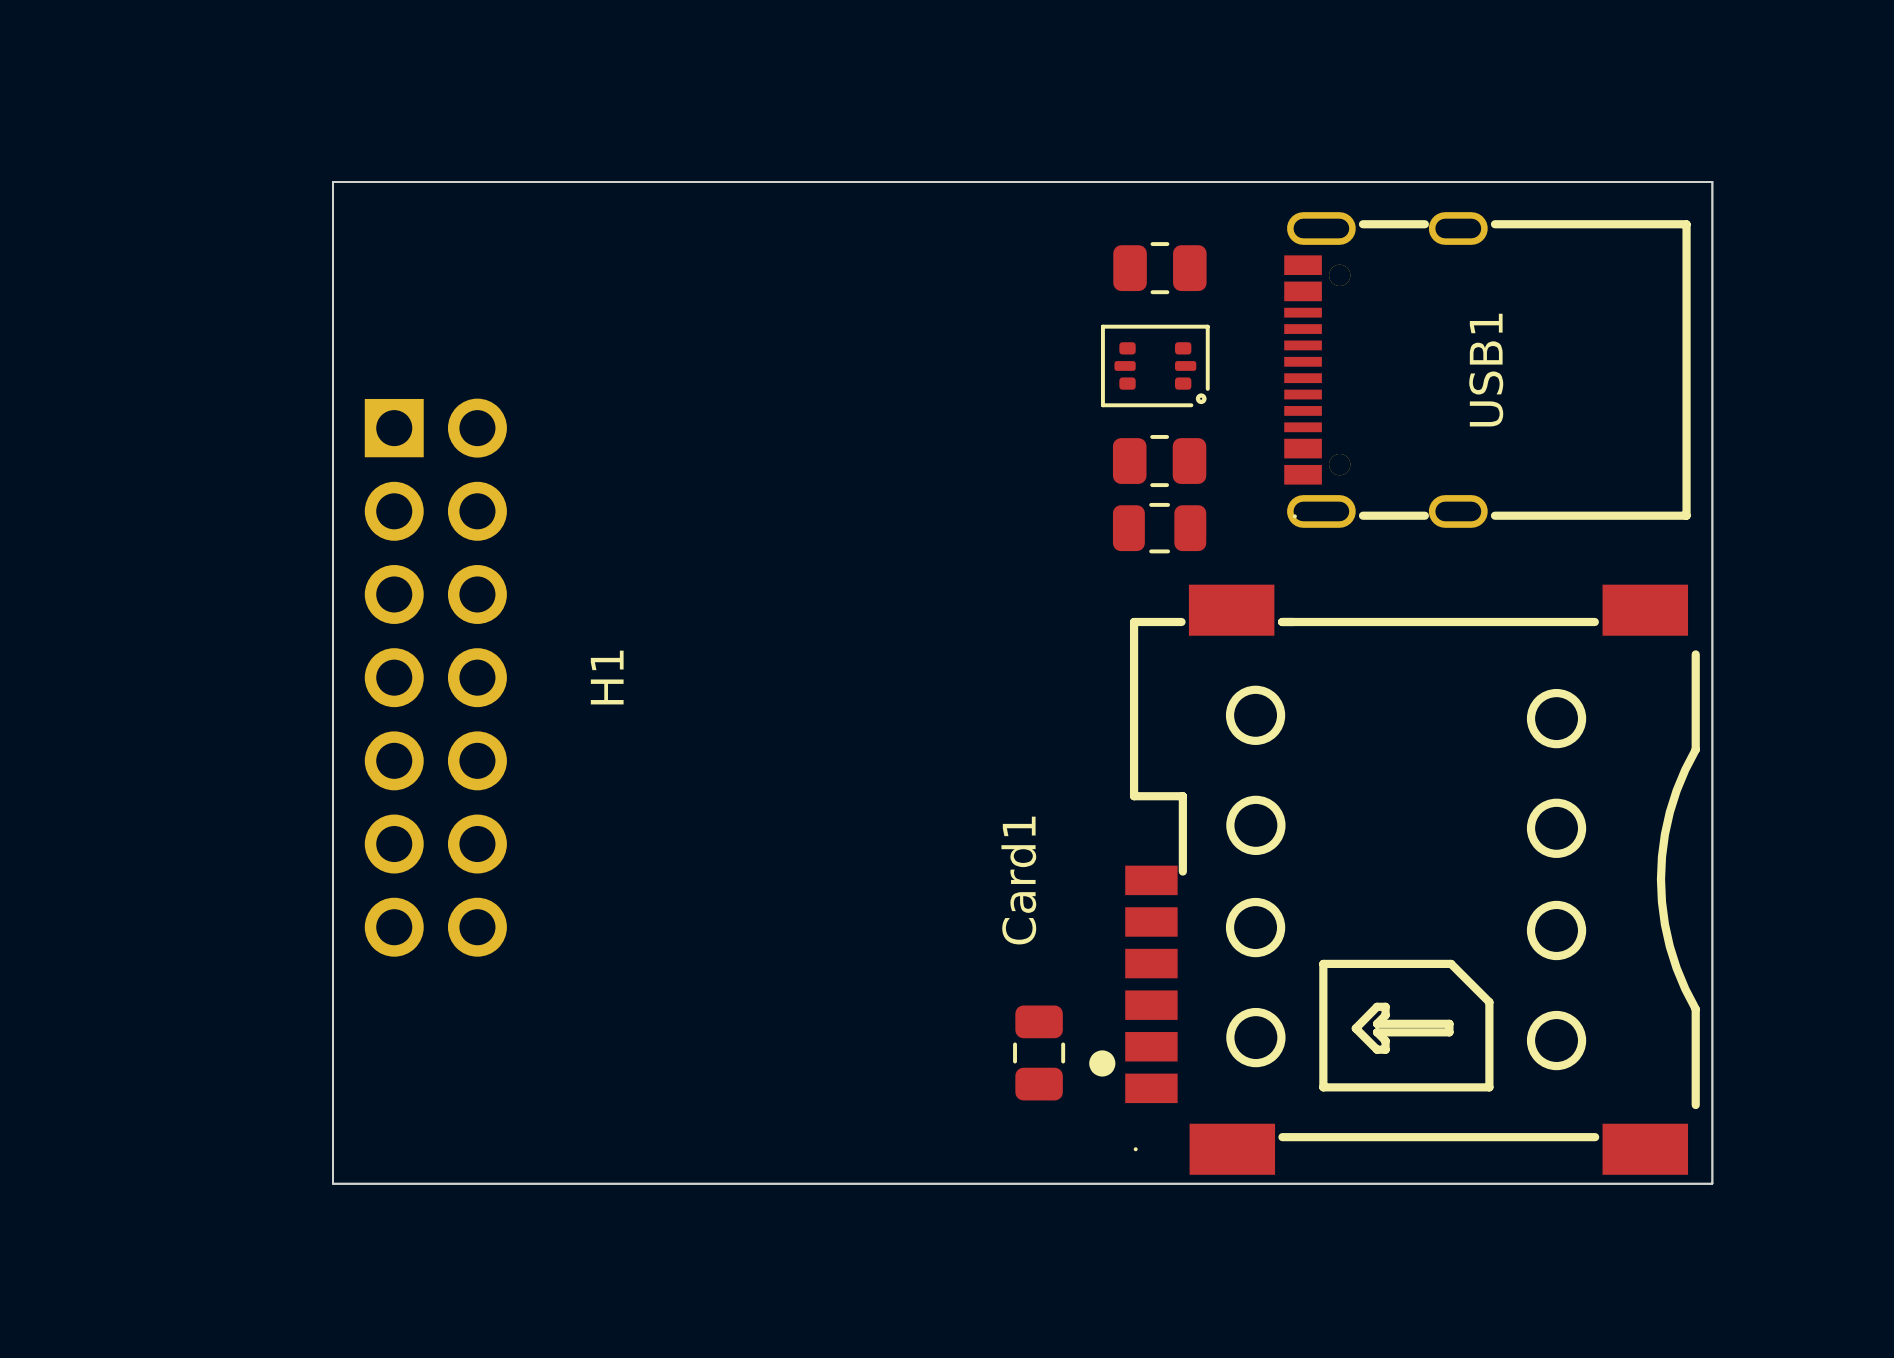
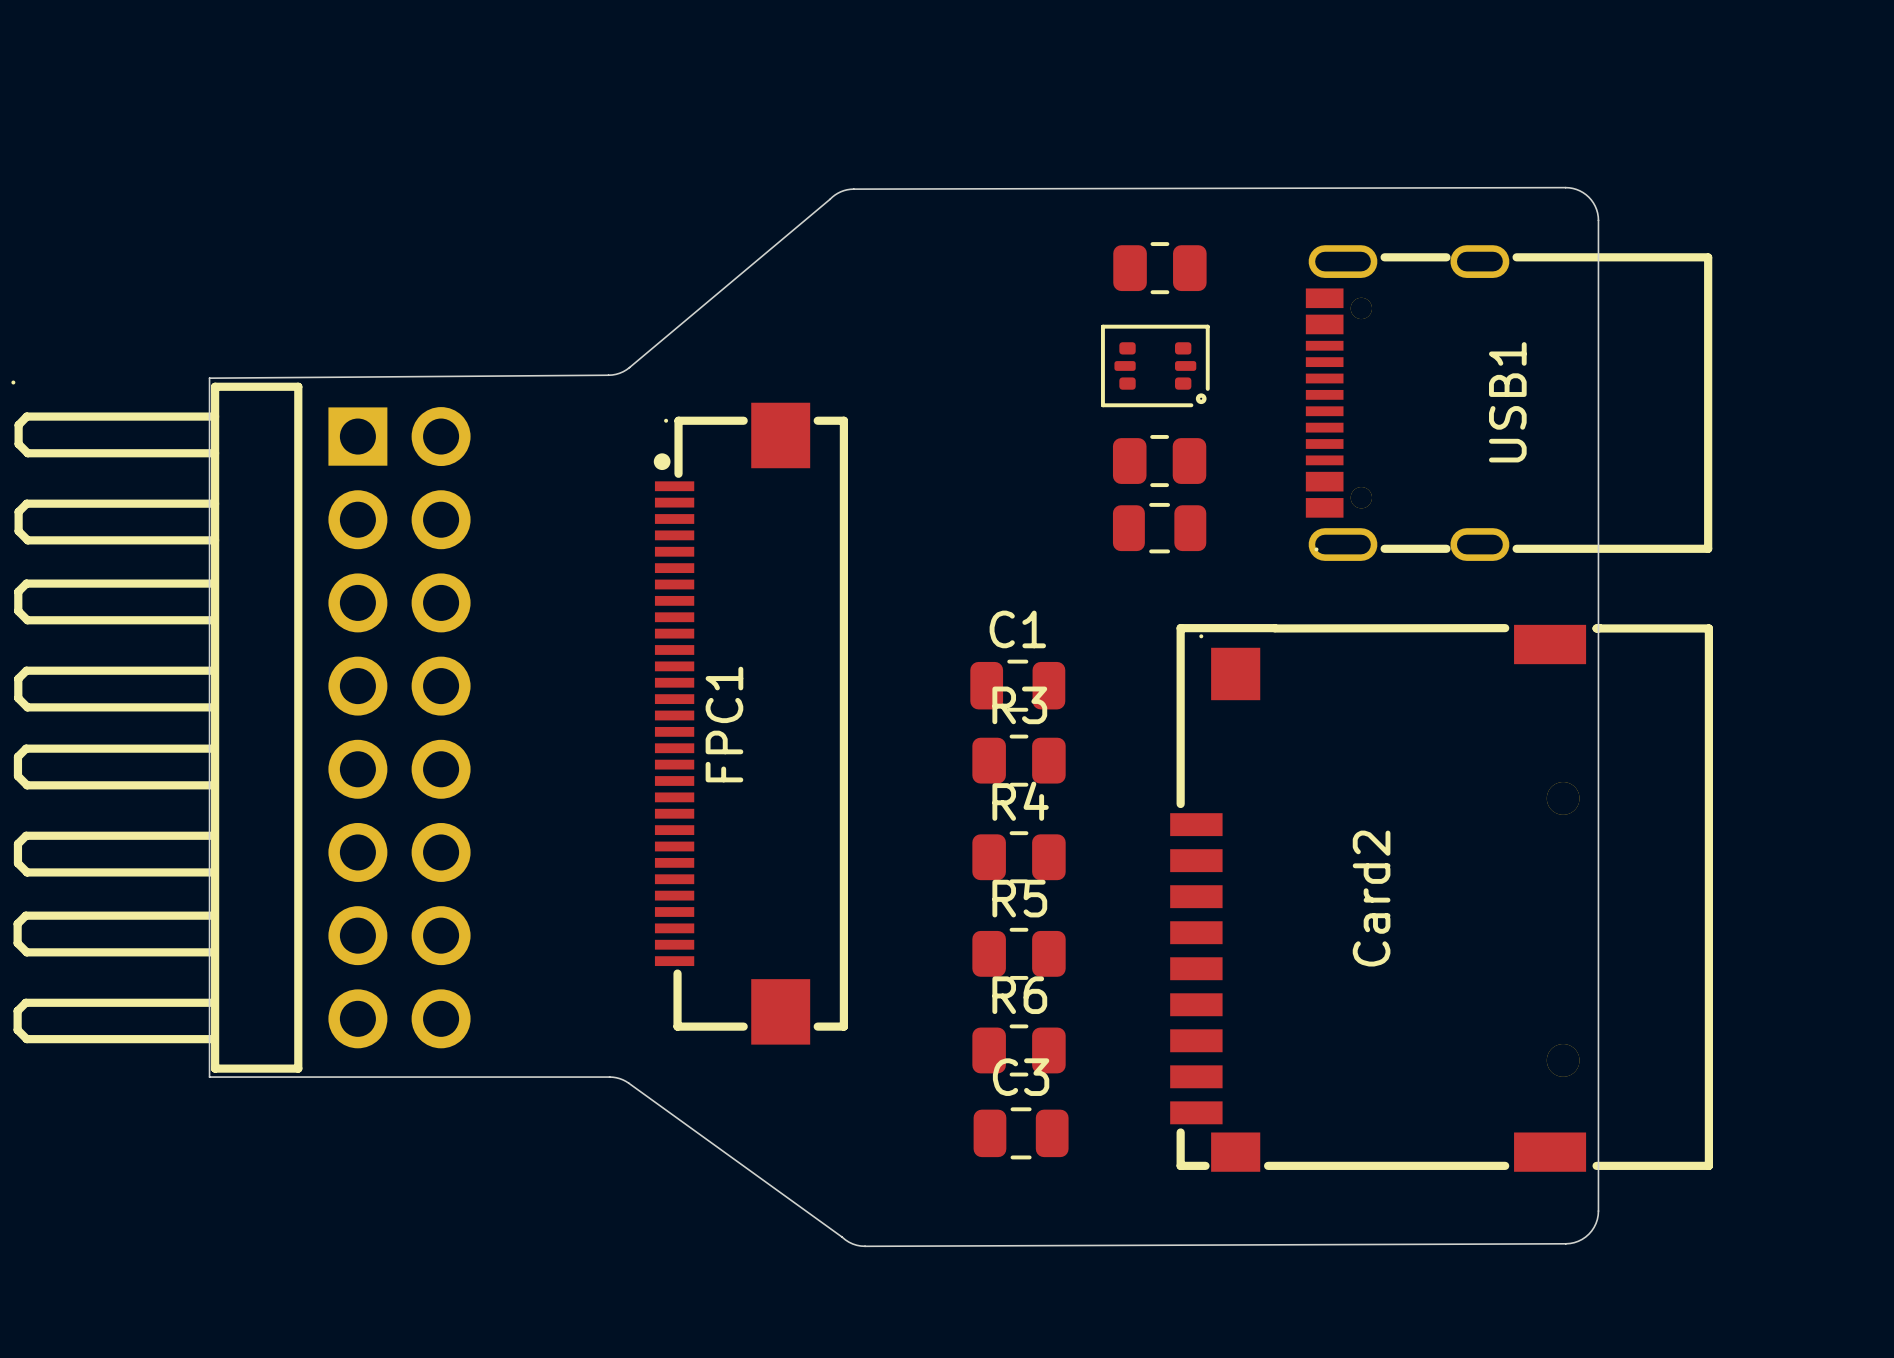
board edge: (333, 181) (1712, 181) (1712, 1183) (333, 1183) (333, 181) -> (1565, 187) (850, 189) (832, 197) (629, 367) (616, 374) (209, 378) (209, 1077) (616, 1077) (628, 1083) (845, 1239) (860, 1246) (1565, 1243) (1582, 1239) (1594, 1227) (1598, 1211) (1598, 220) (1595, 206) (1588, 197) (1576, 189) (1565, 187)
USB1 position: (1487, 369) -> (1509, 403)
H1: (435, 677) -> none
C1: none -> (1017, 685)
FPC1: none -> (750, 723)
part: none -> (240, 726)
R3: none -> (1019, 760)
R4: none -> (1019, 857)
Card1: (1394, 879) -> none
Card2: none -> (1441, 897)
R5: none -> (1019, 953)
R6: none -> (1019, 1050)
part: (1039, 1052) -> none
C3: none -> (1021, 1133)

